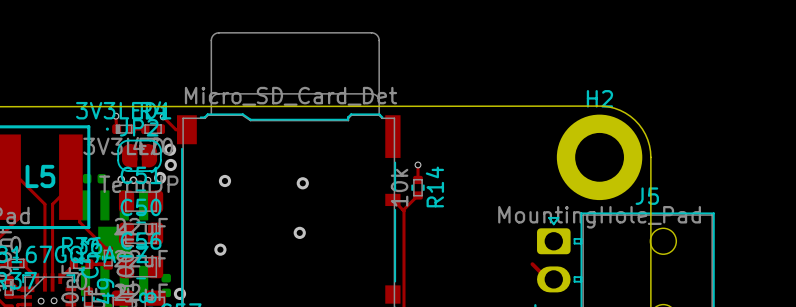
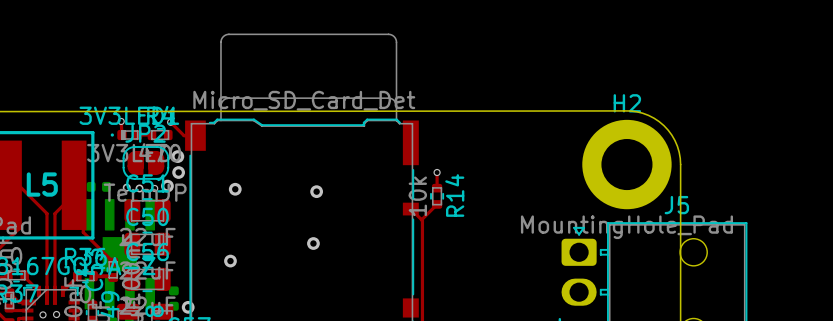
top track: (532, 264) (547, 279) -> none

